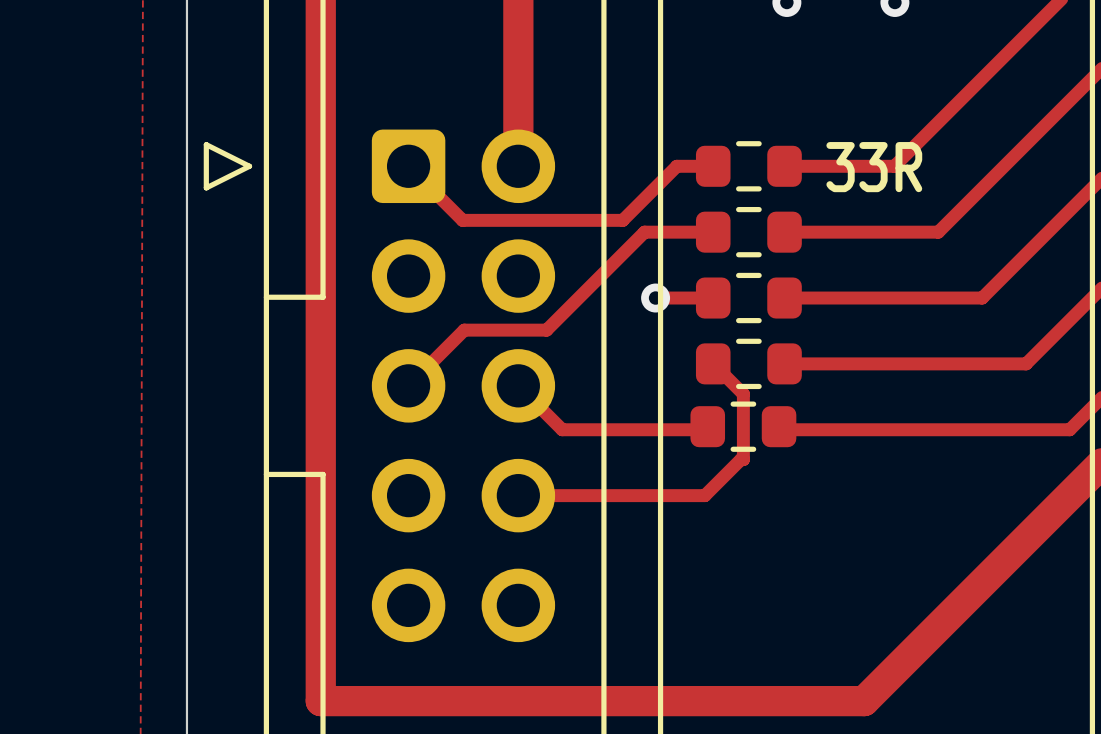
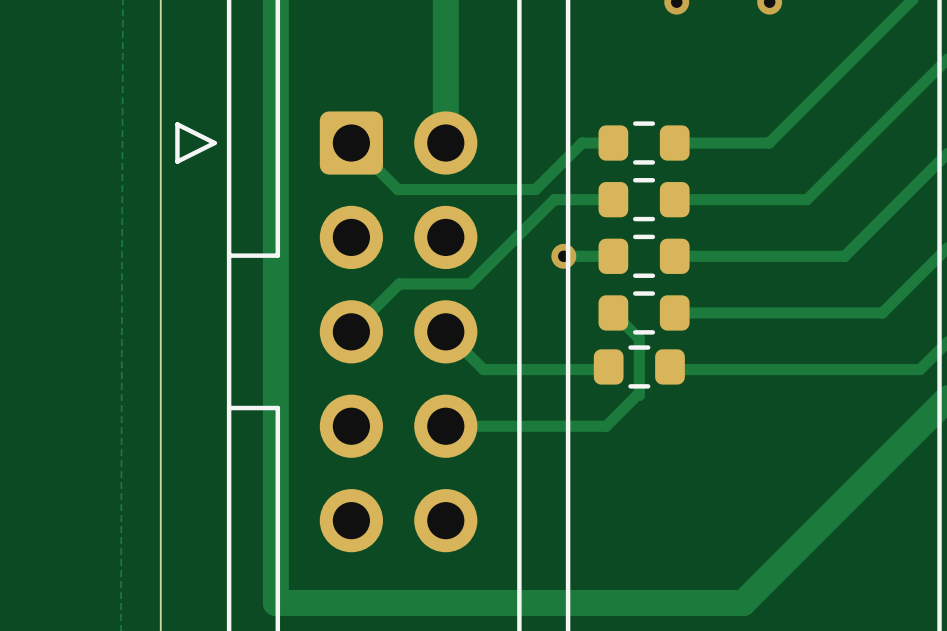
part value: 33R (874, 167) -> none

